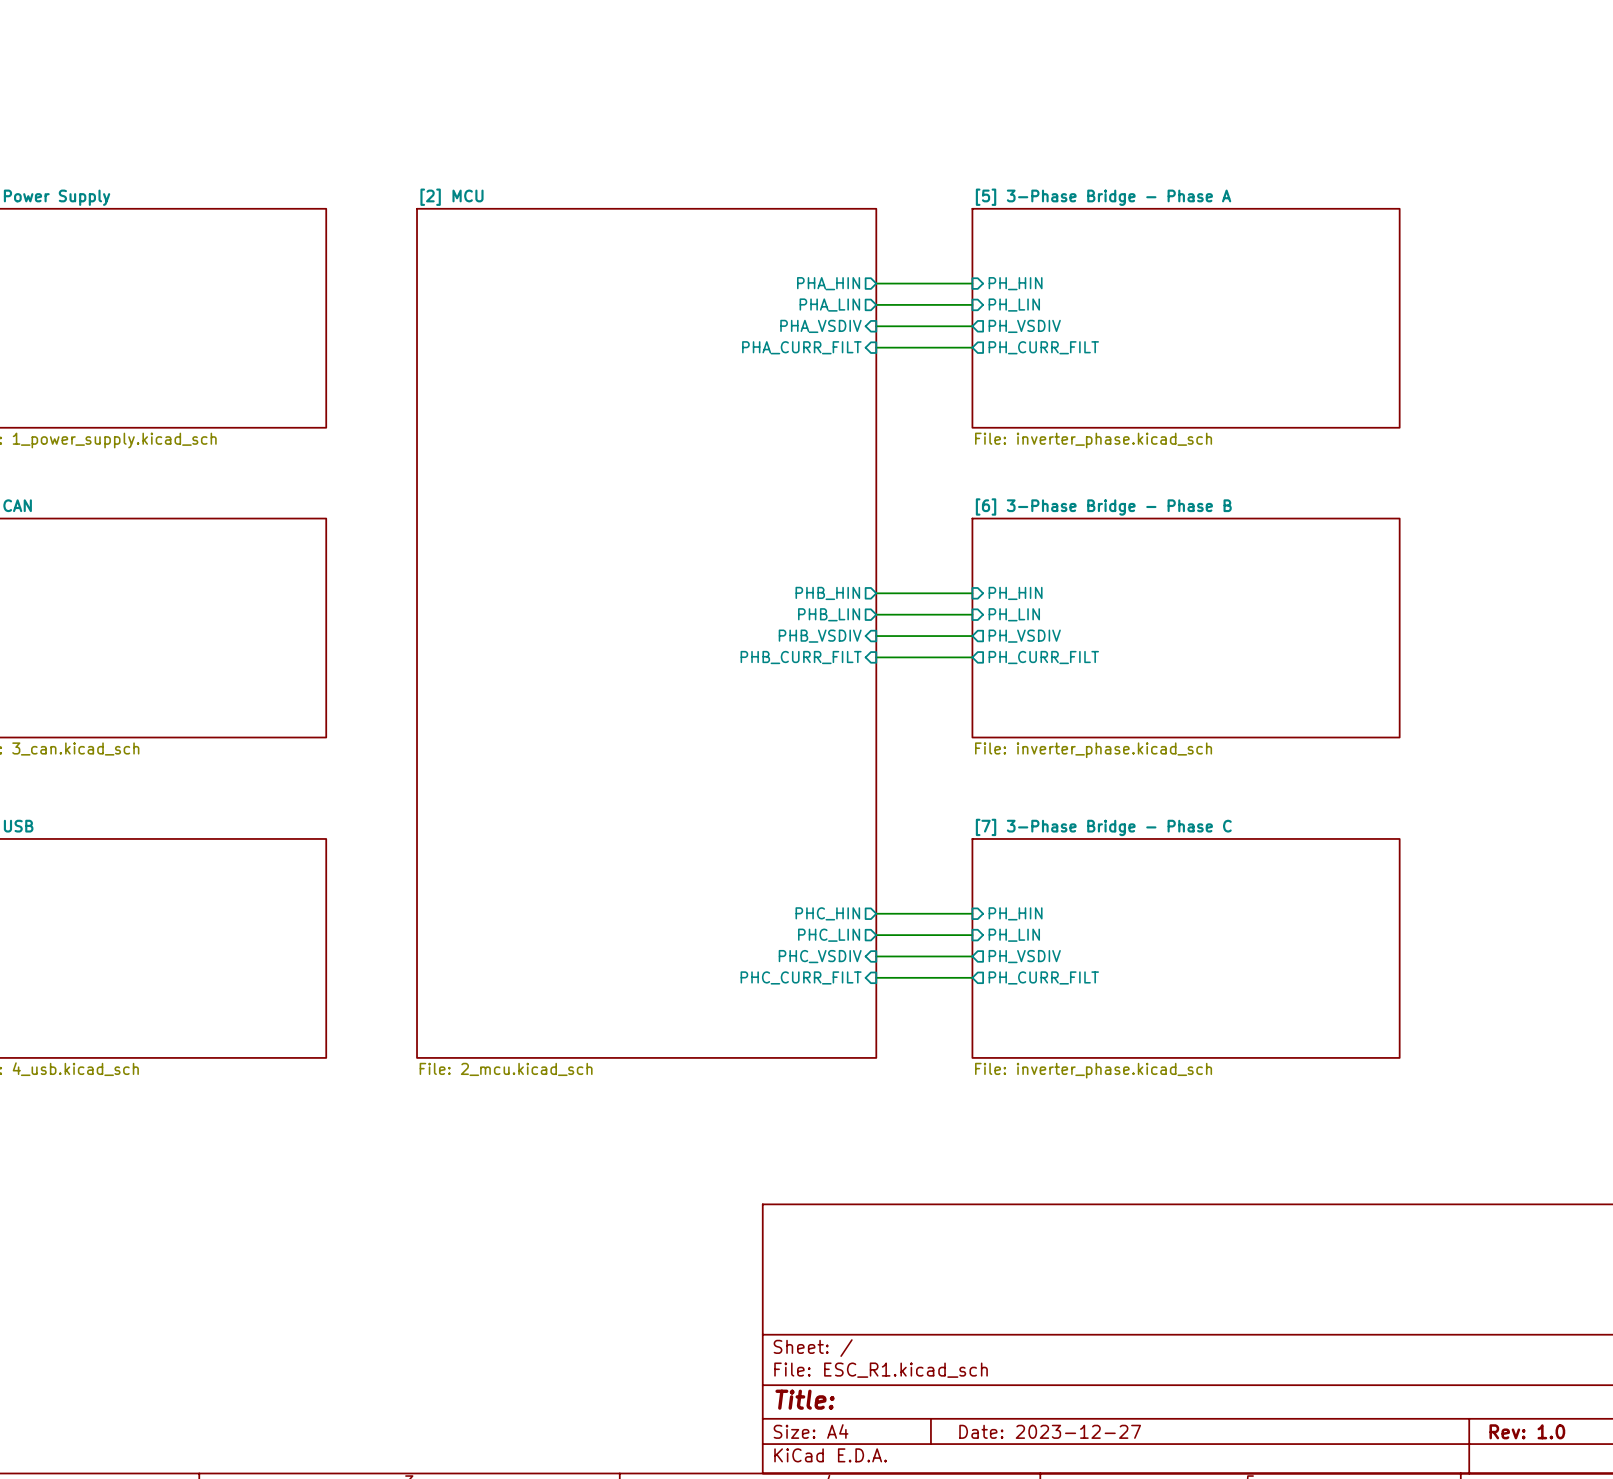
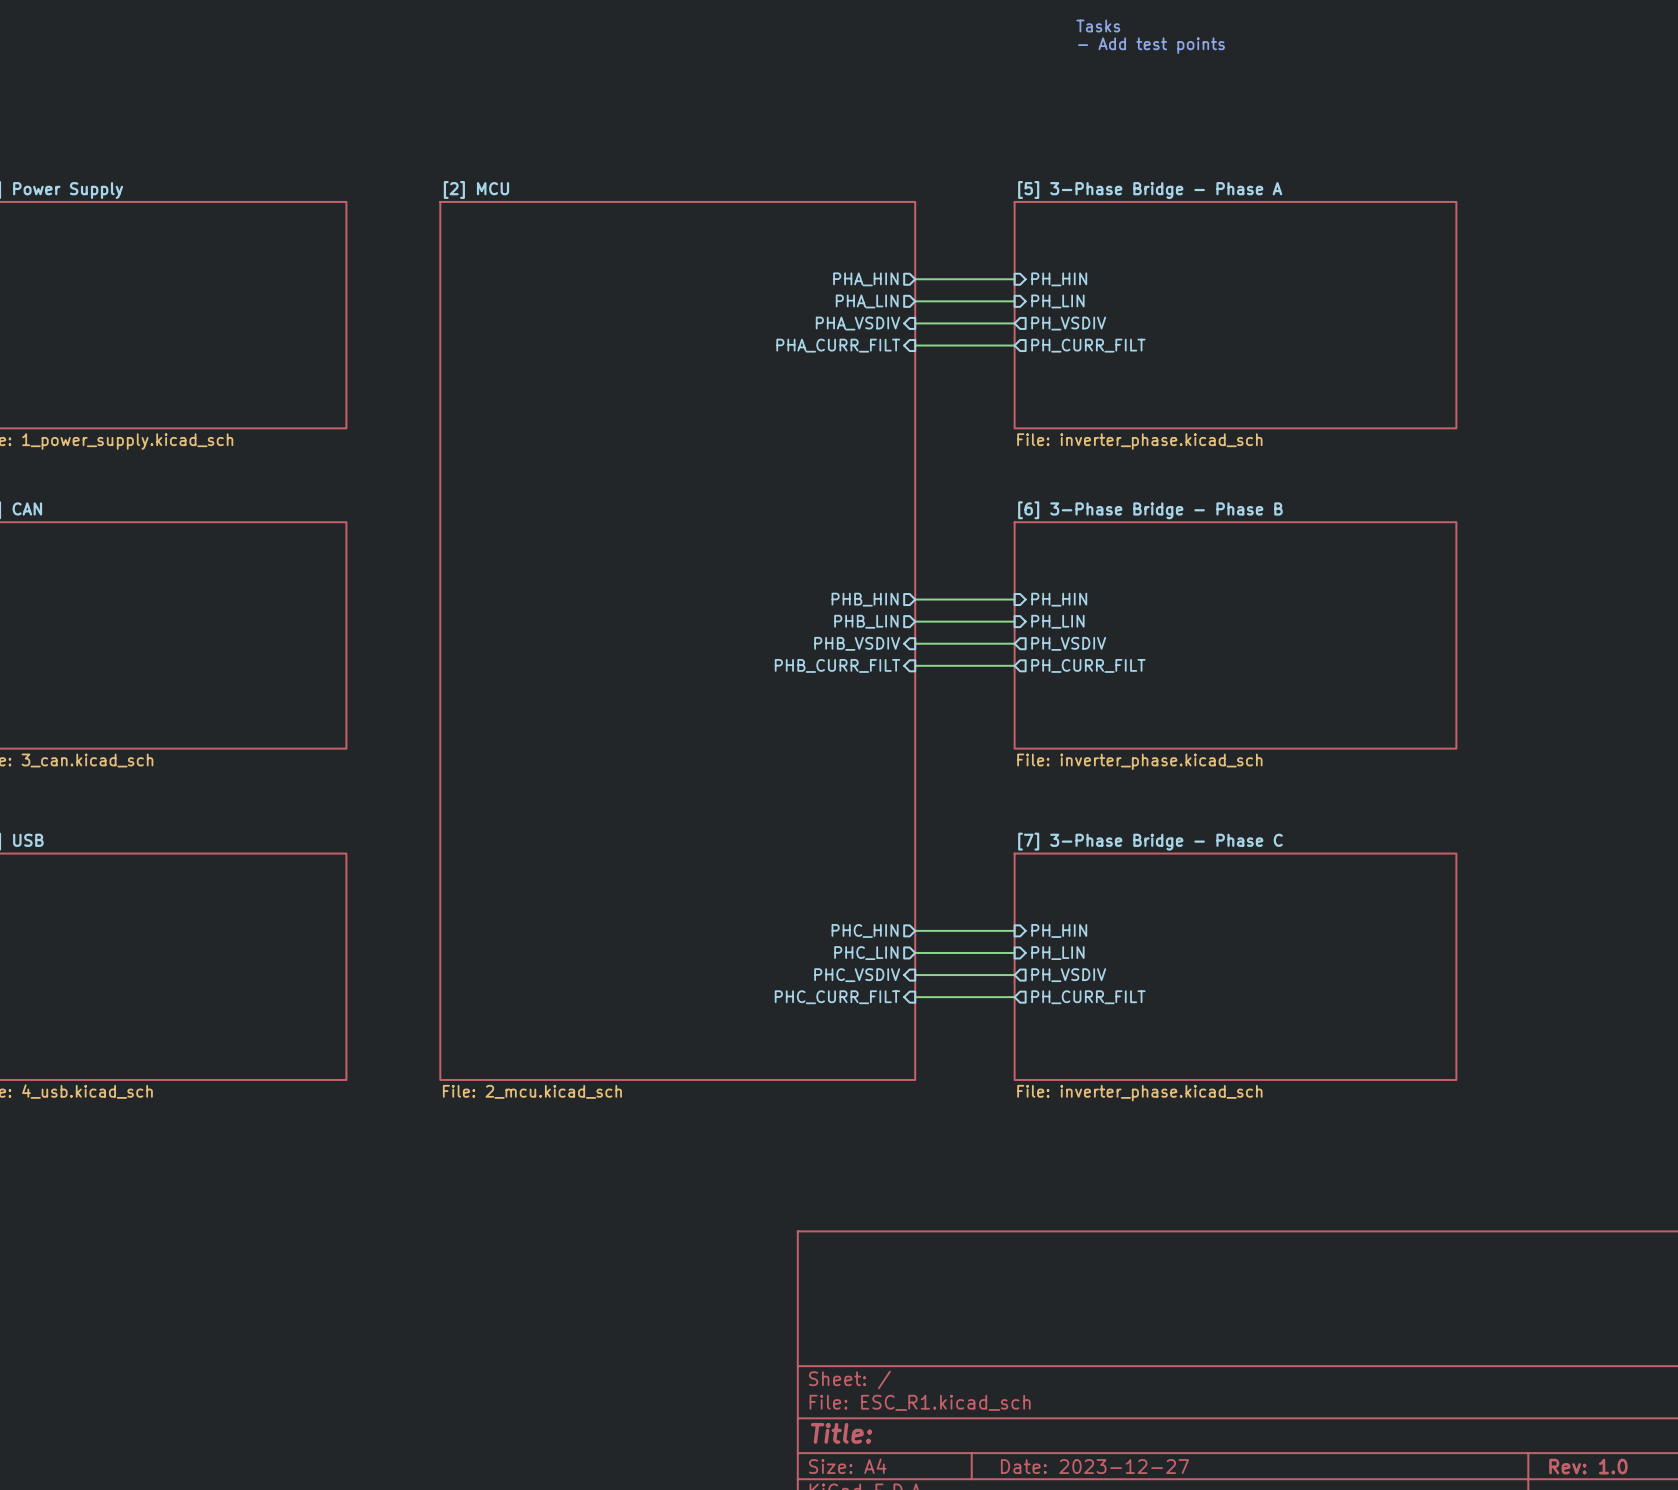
text: none -> Tasks (1098, 26)
text: none -> - Add test points (1151, 45)

